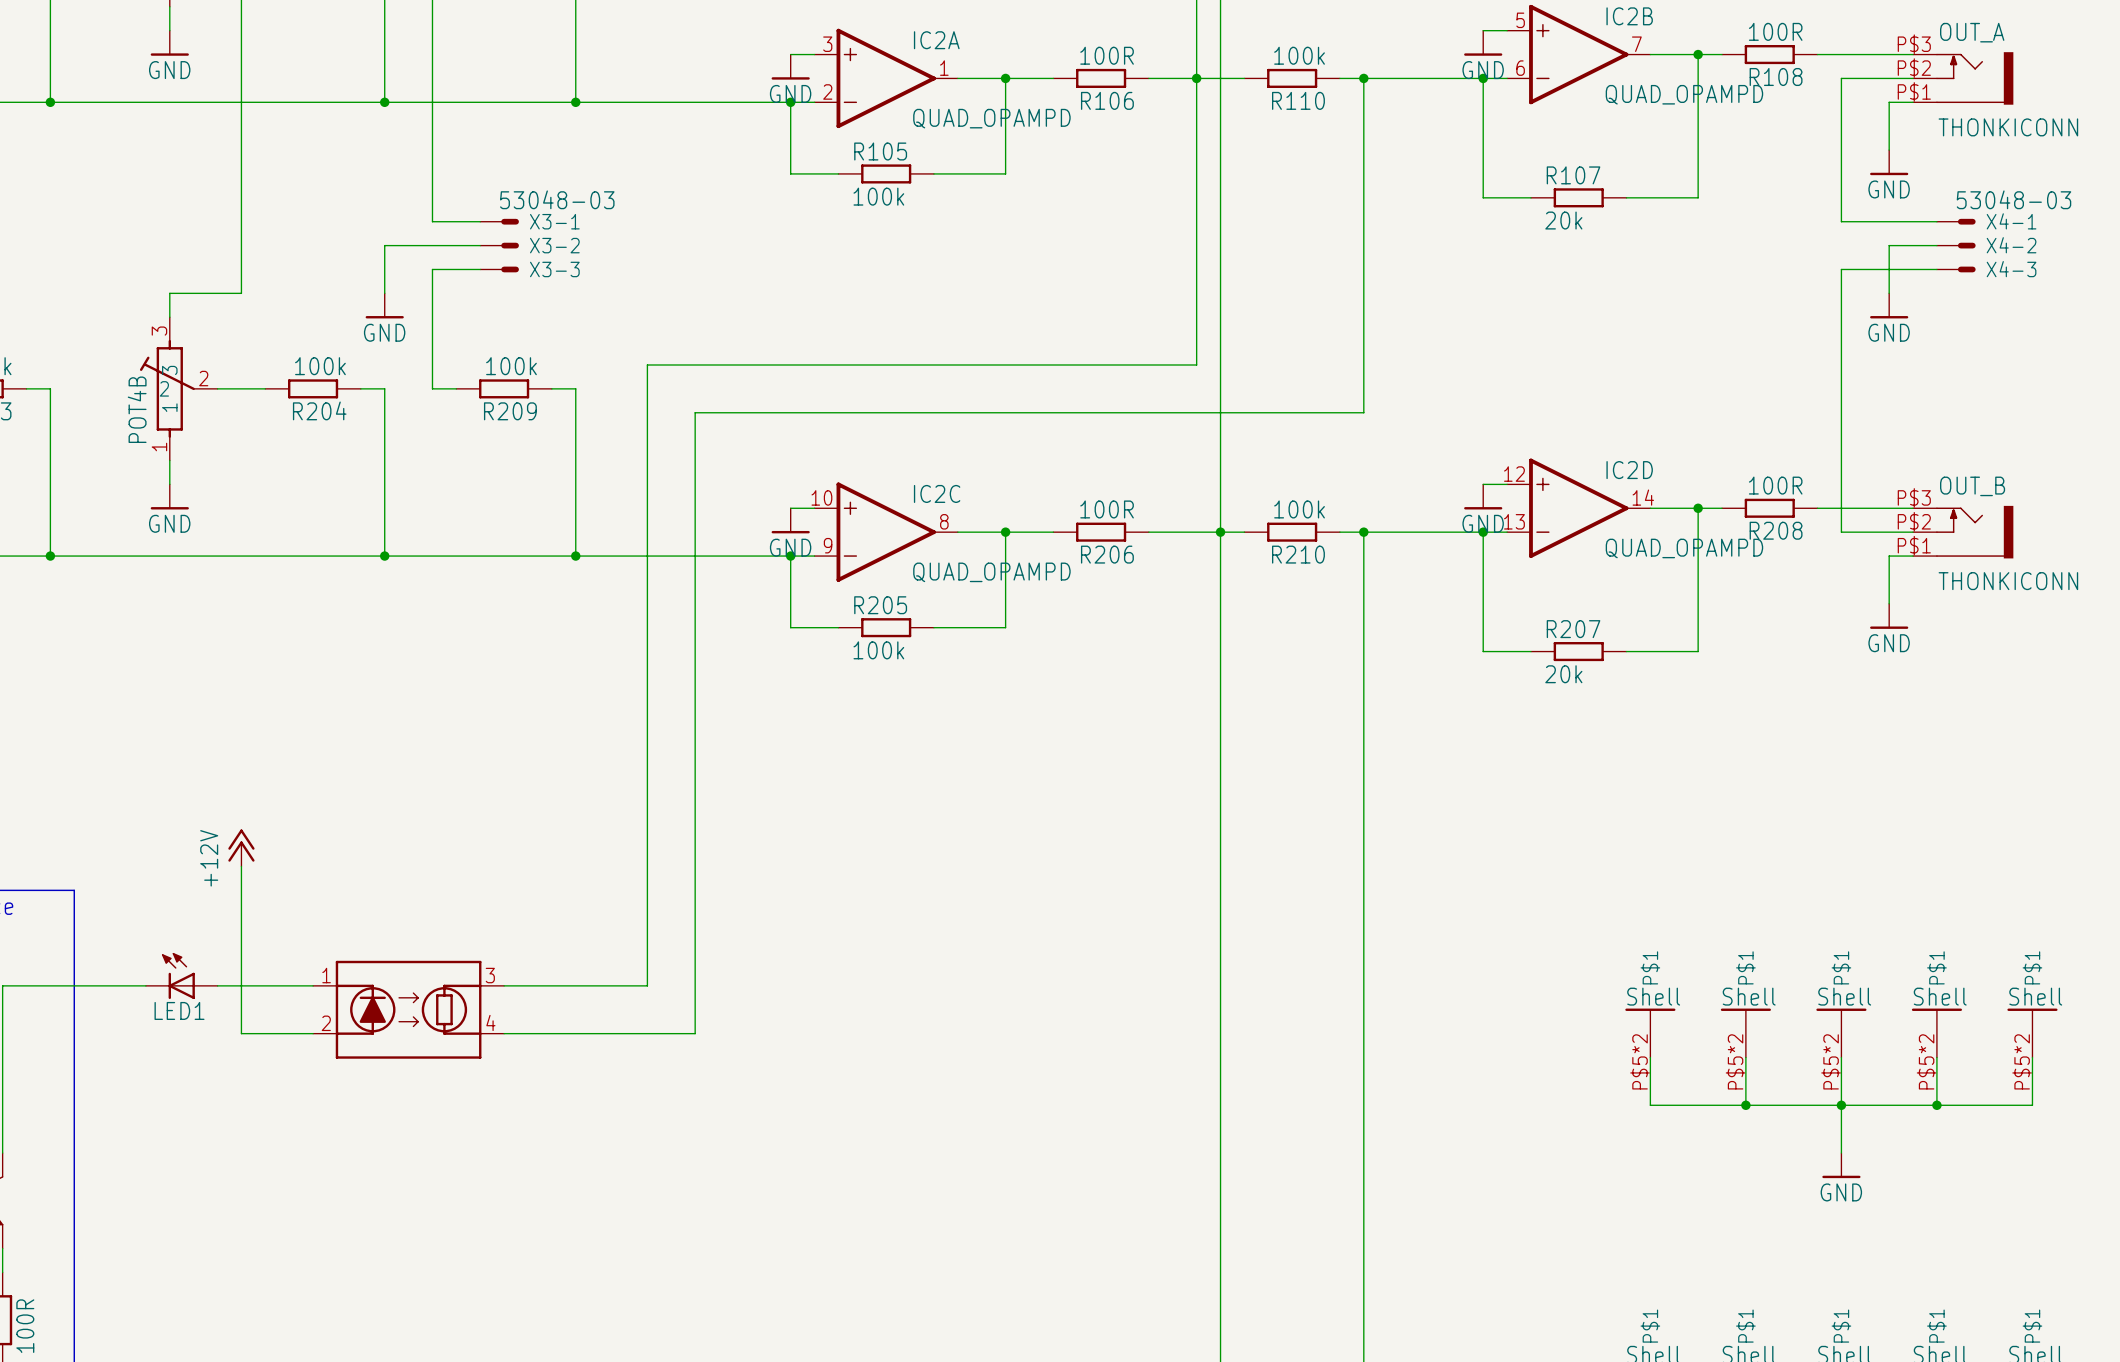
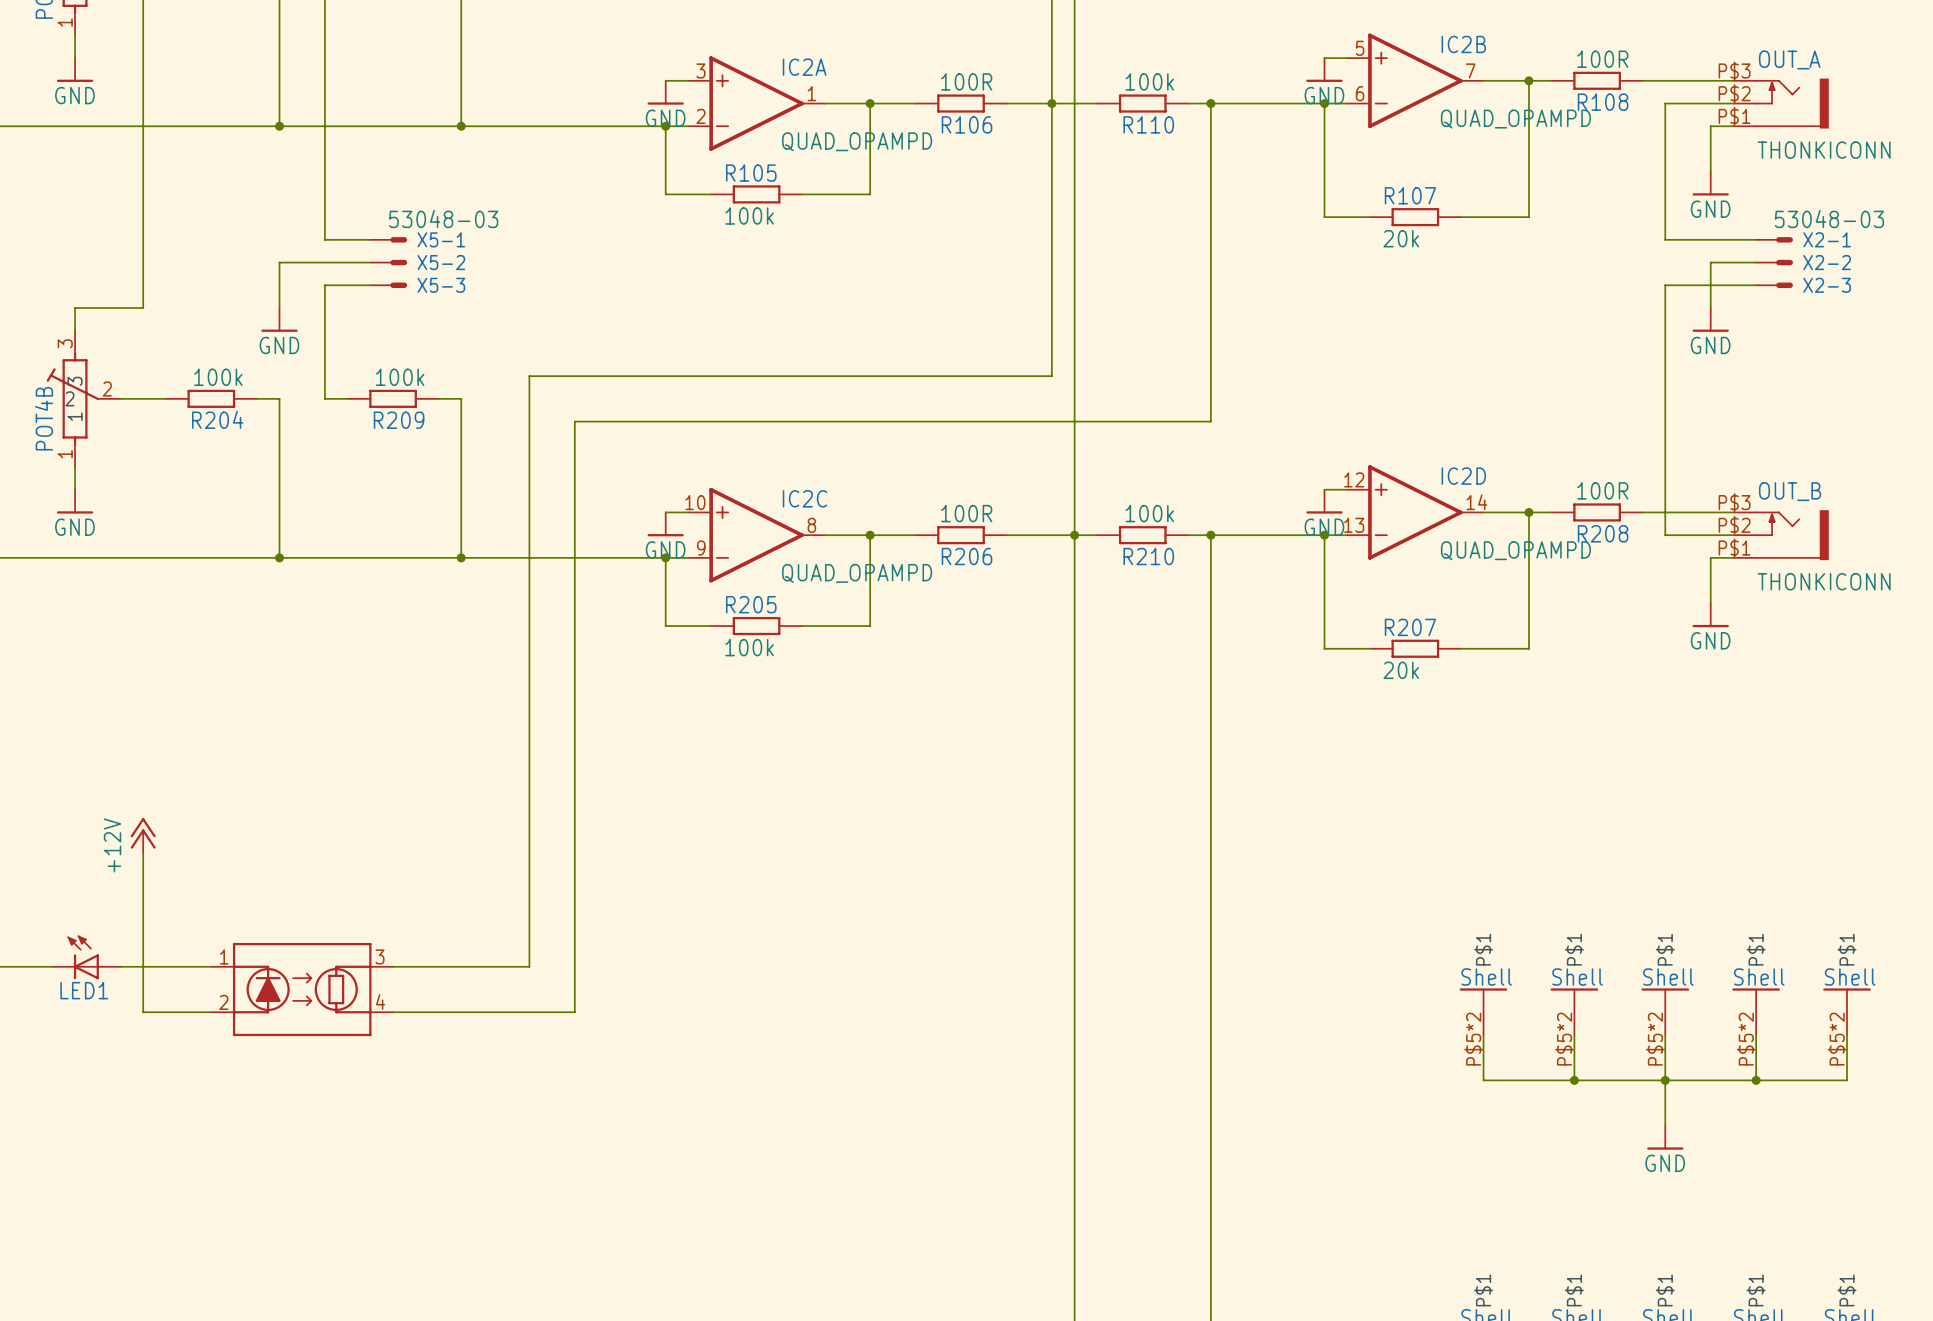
X3-1 name: X3-1 (554, 221) -> X5-1 (441, 239)
X4-1 name: X4-1 (2011, 221) -> X2-1 (1827, 239)
X3-2 name: X3-2 (554, 245) -> X5-2 (441, 262)
X4-2 name: X4-2 (2011, 245) -> X2-2 (1827, 262)
X3-3 name: X3-3 (554, 269) -> X5-3 (441, 285)
X4-3 name: X4-3 (2011, 269) -> X2-3 (1827, 285)

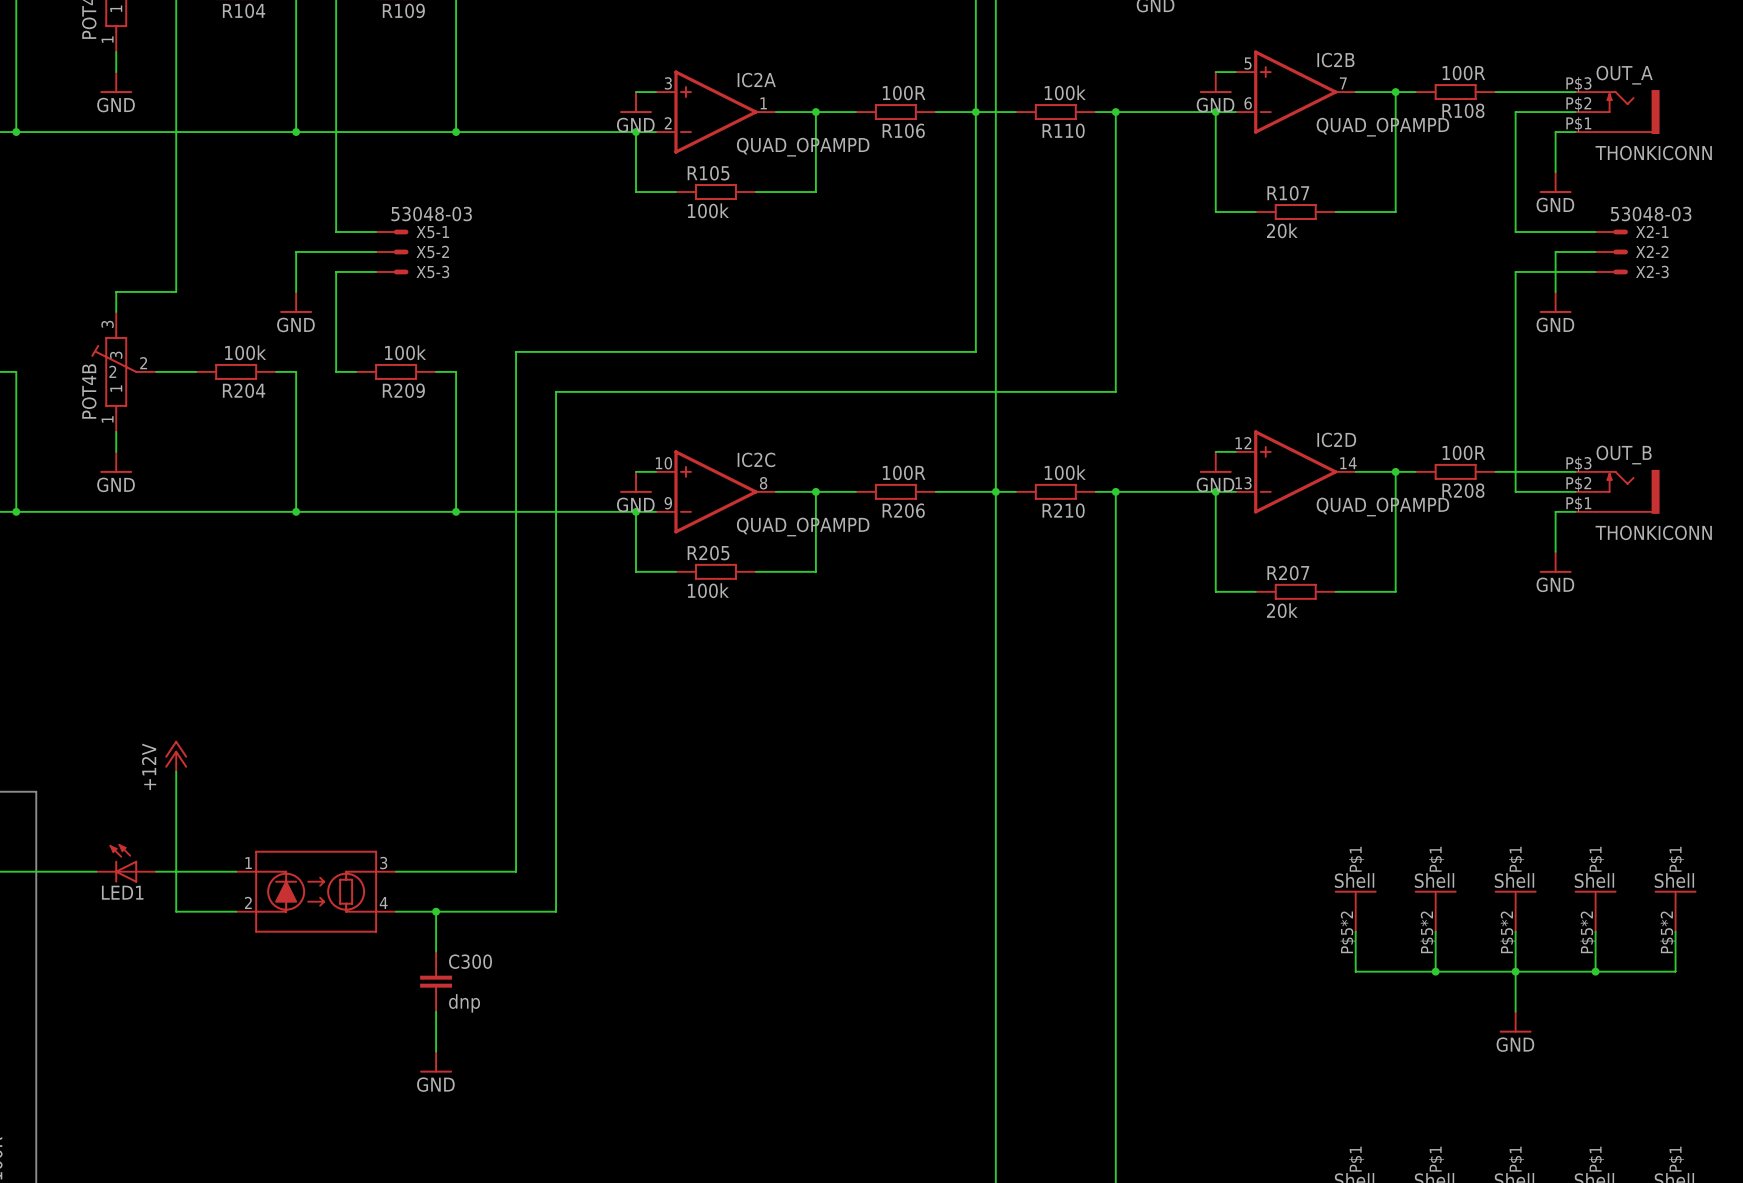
wire: none -> (436, 911) (436, 951)
junction: none -> (436, 911)
C300: none -> dnp (436, 981)
wire: none -> (436, 1011) (436, 1051)
power symbol: none -> GND (436, 1062)

